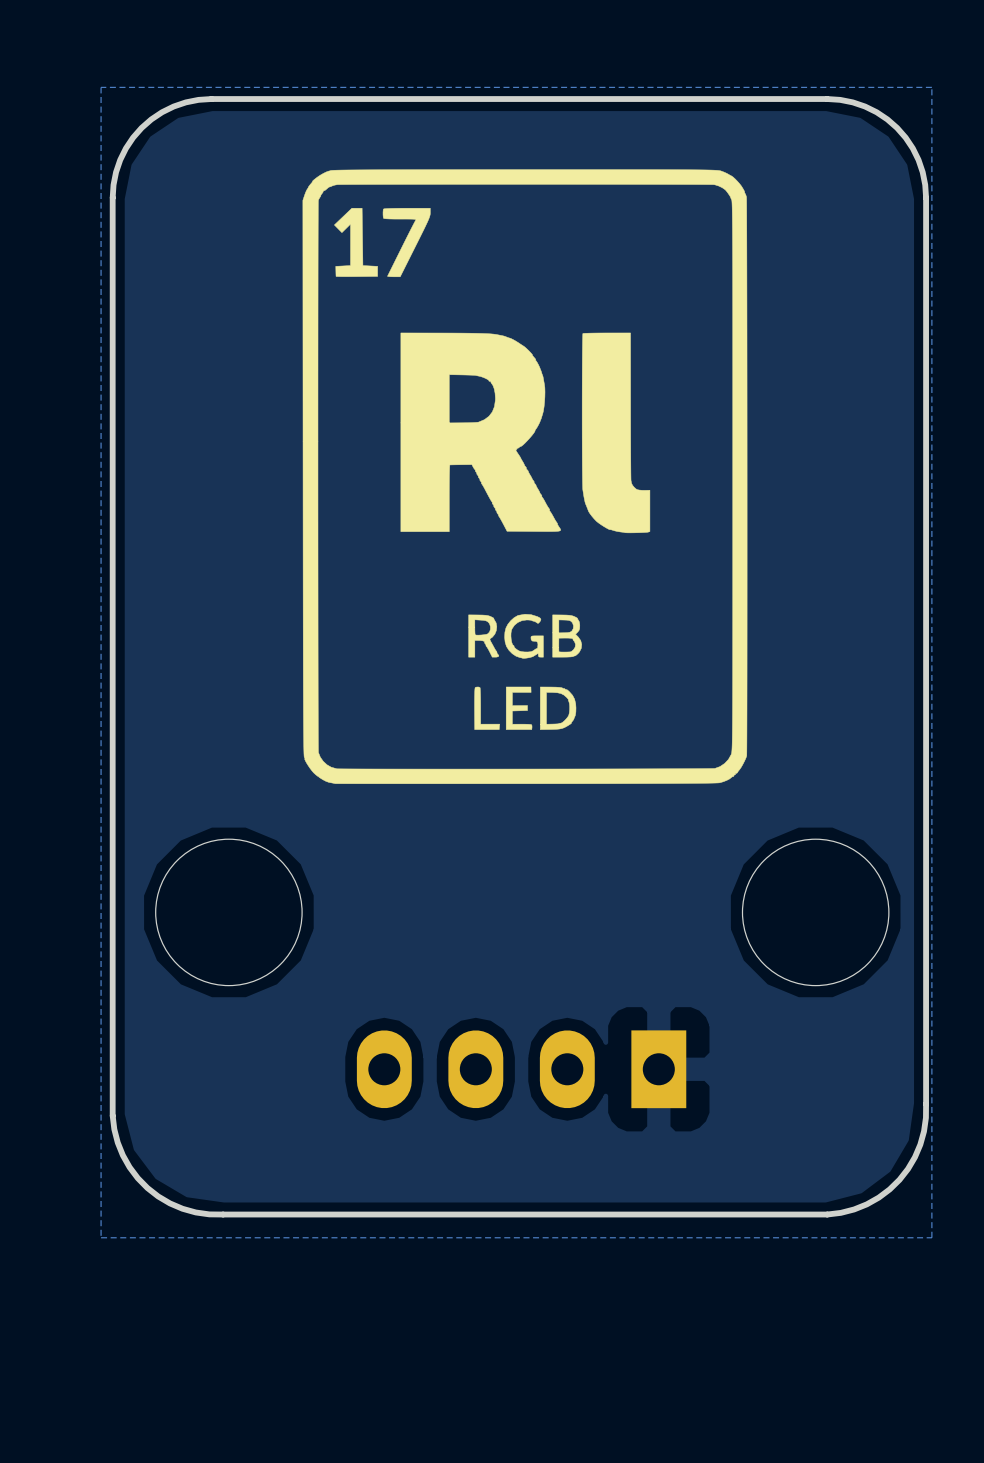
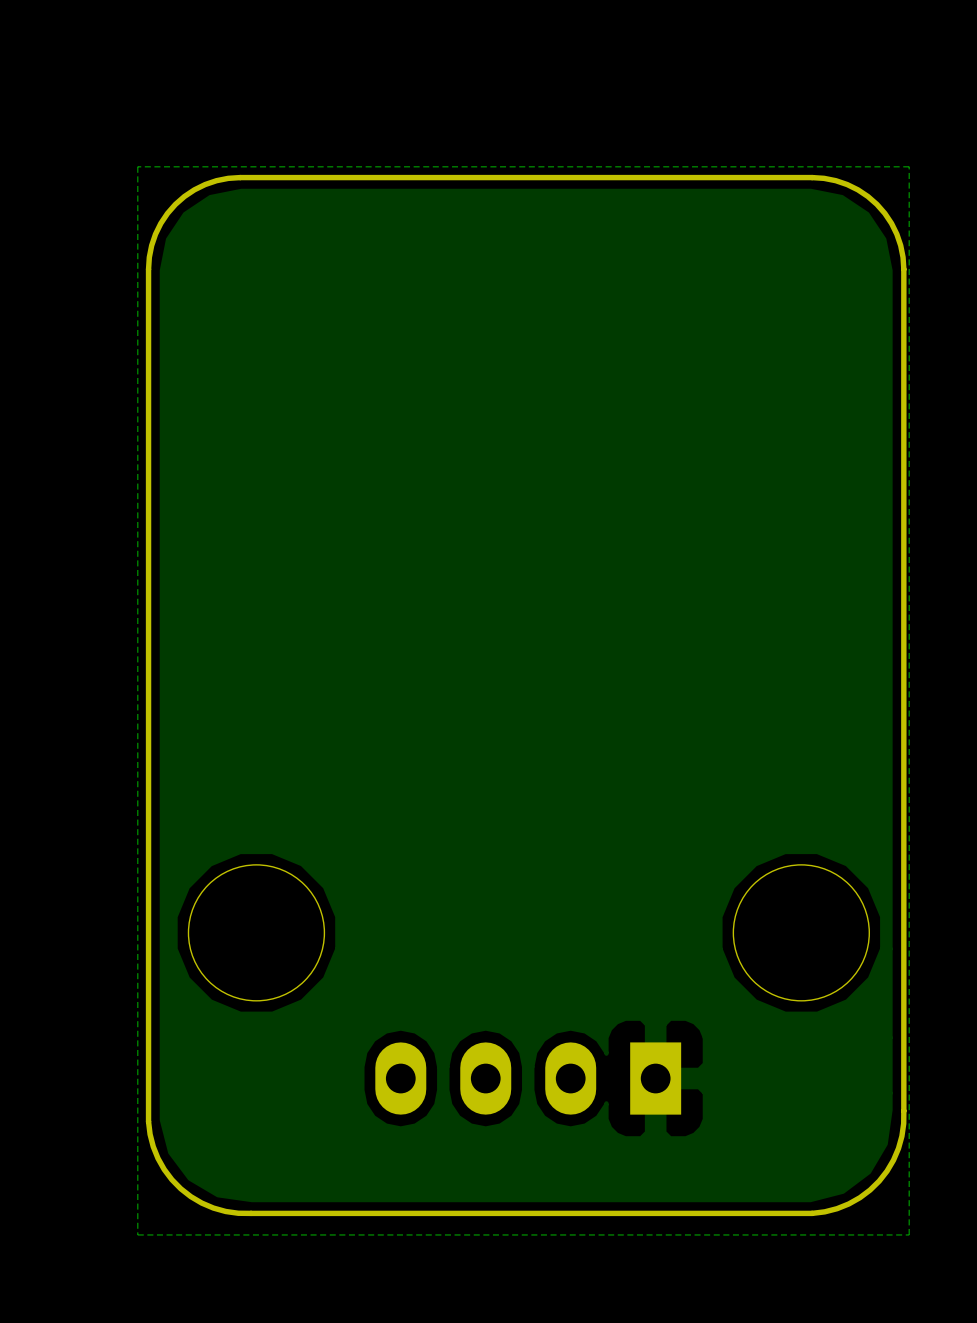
drawing: [302, 169, 748, 784] -> none

